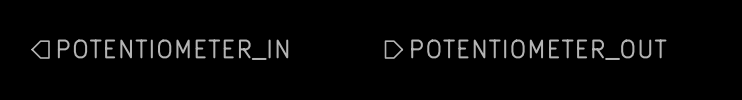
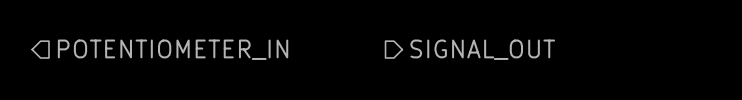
hierarchical label: POTENTIOMETER_OUT (538, 49) -> SIGNAL_OUT (482, 49)

